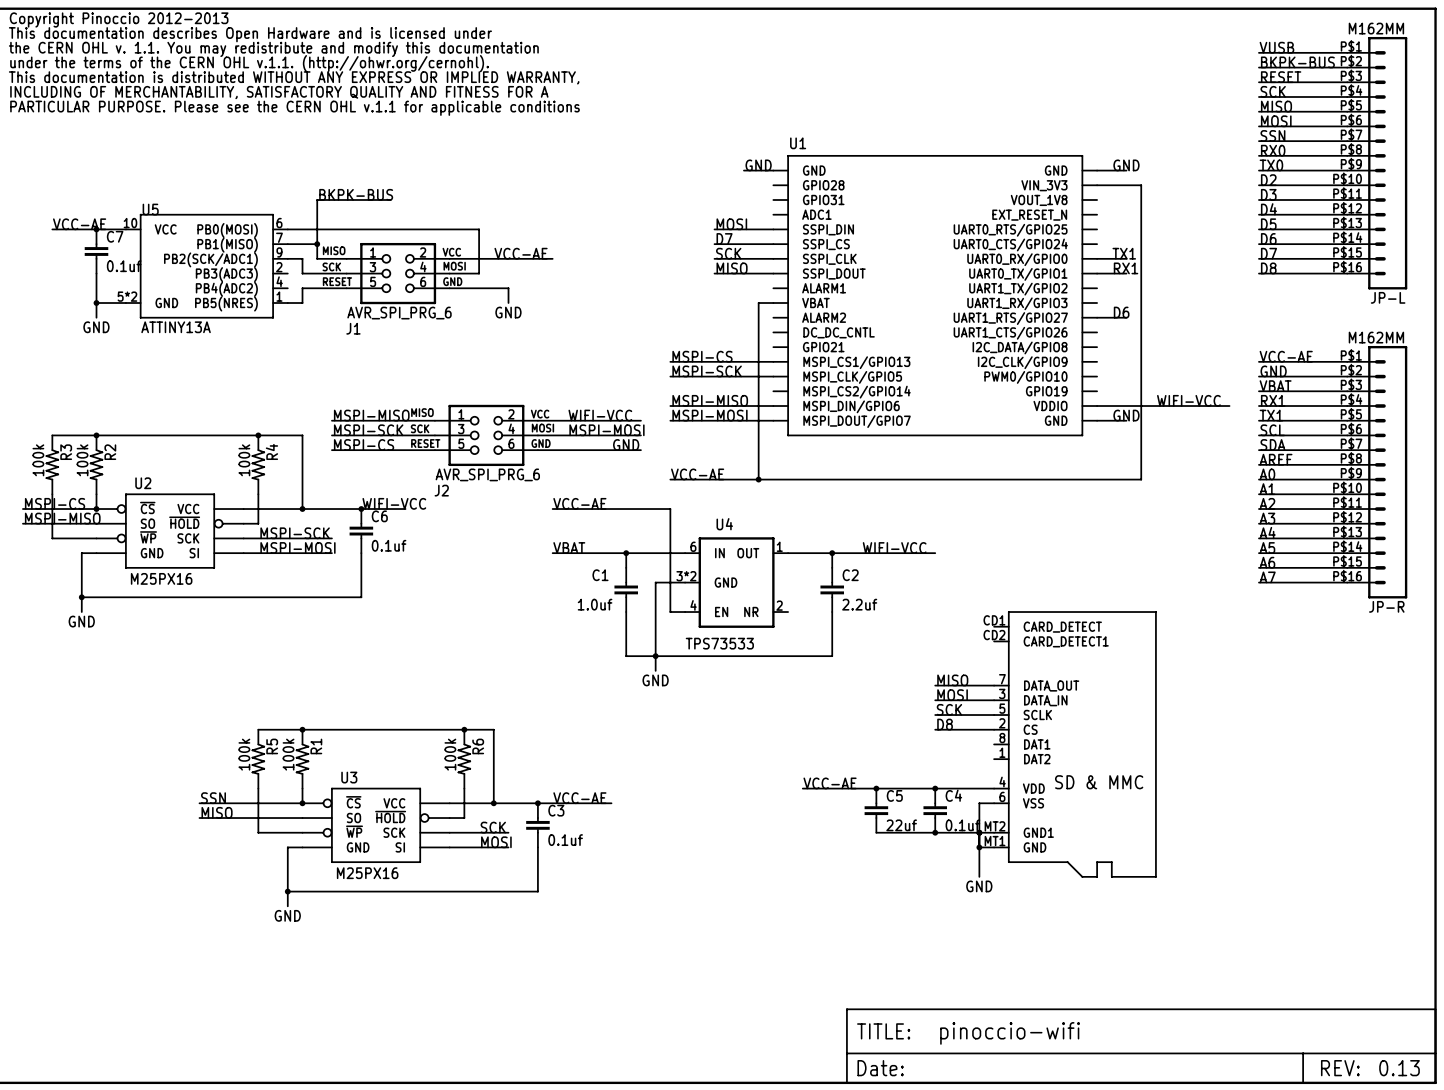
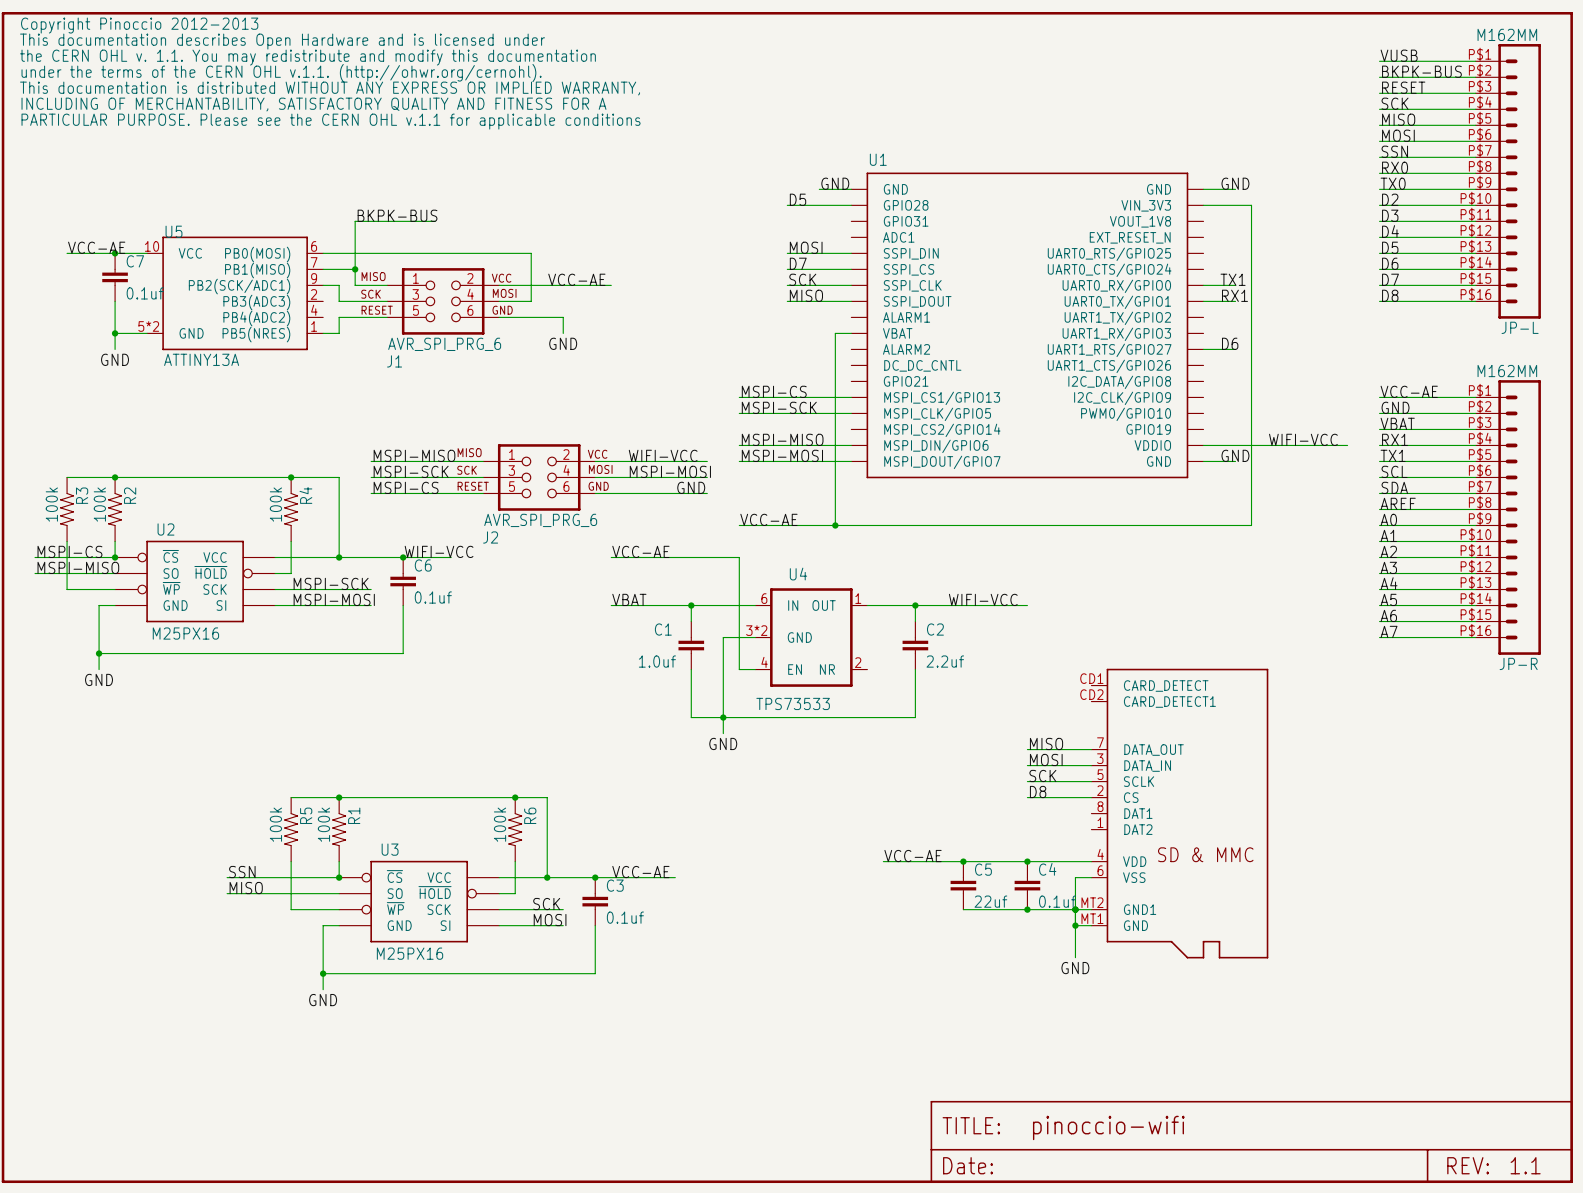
label: none -> D5 (798, 199)
wire: none -> (787, 205) (851, 205)
text: 0.13 (1399, 1068) -> 1.1 (1525, 1165)

